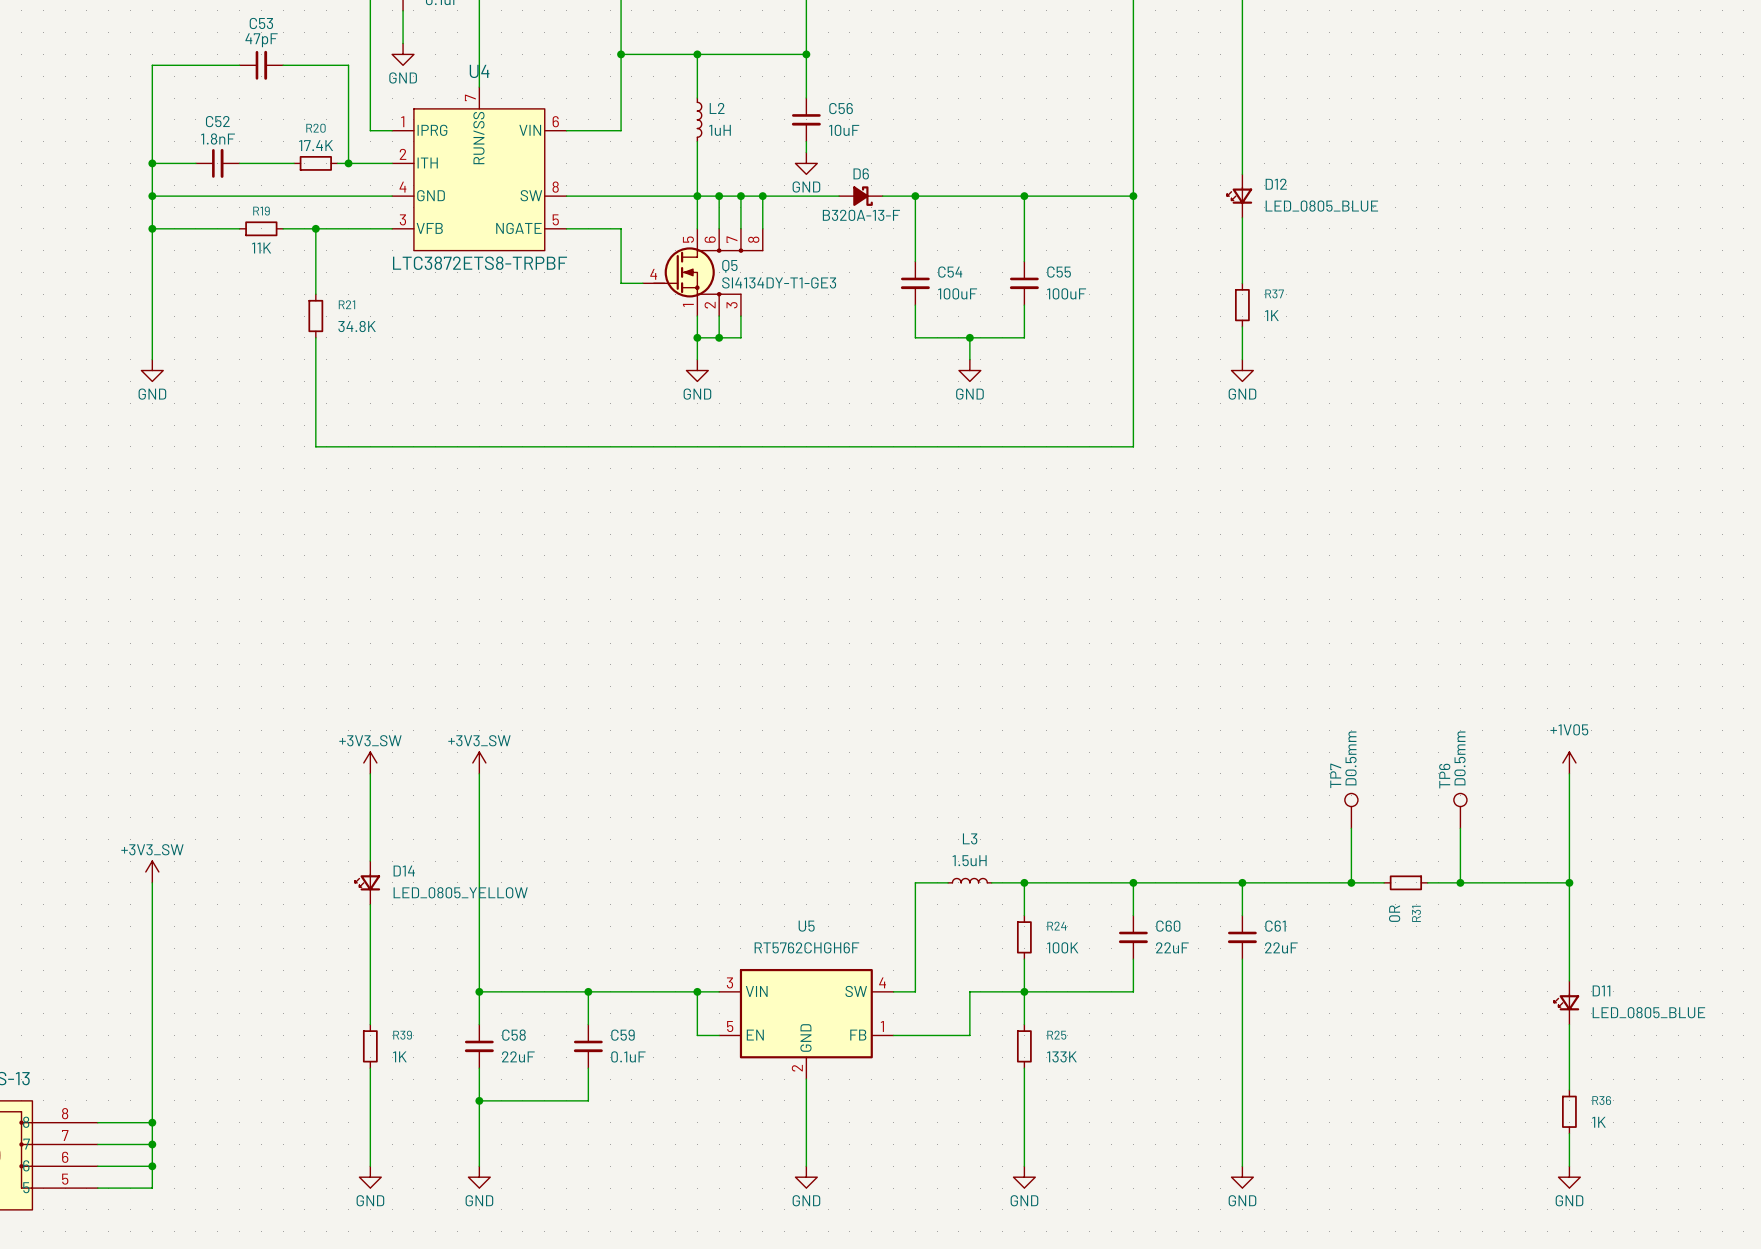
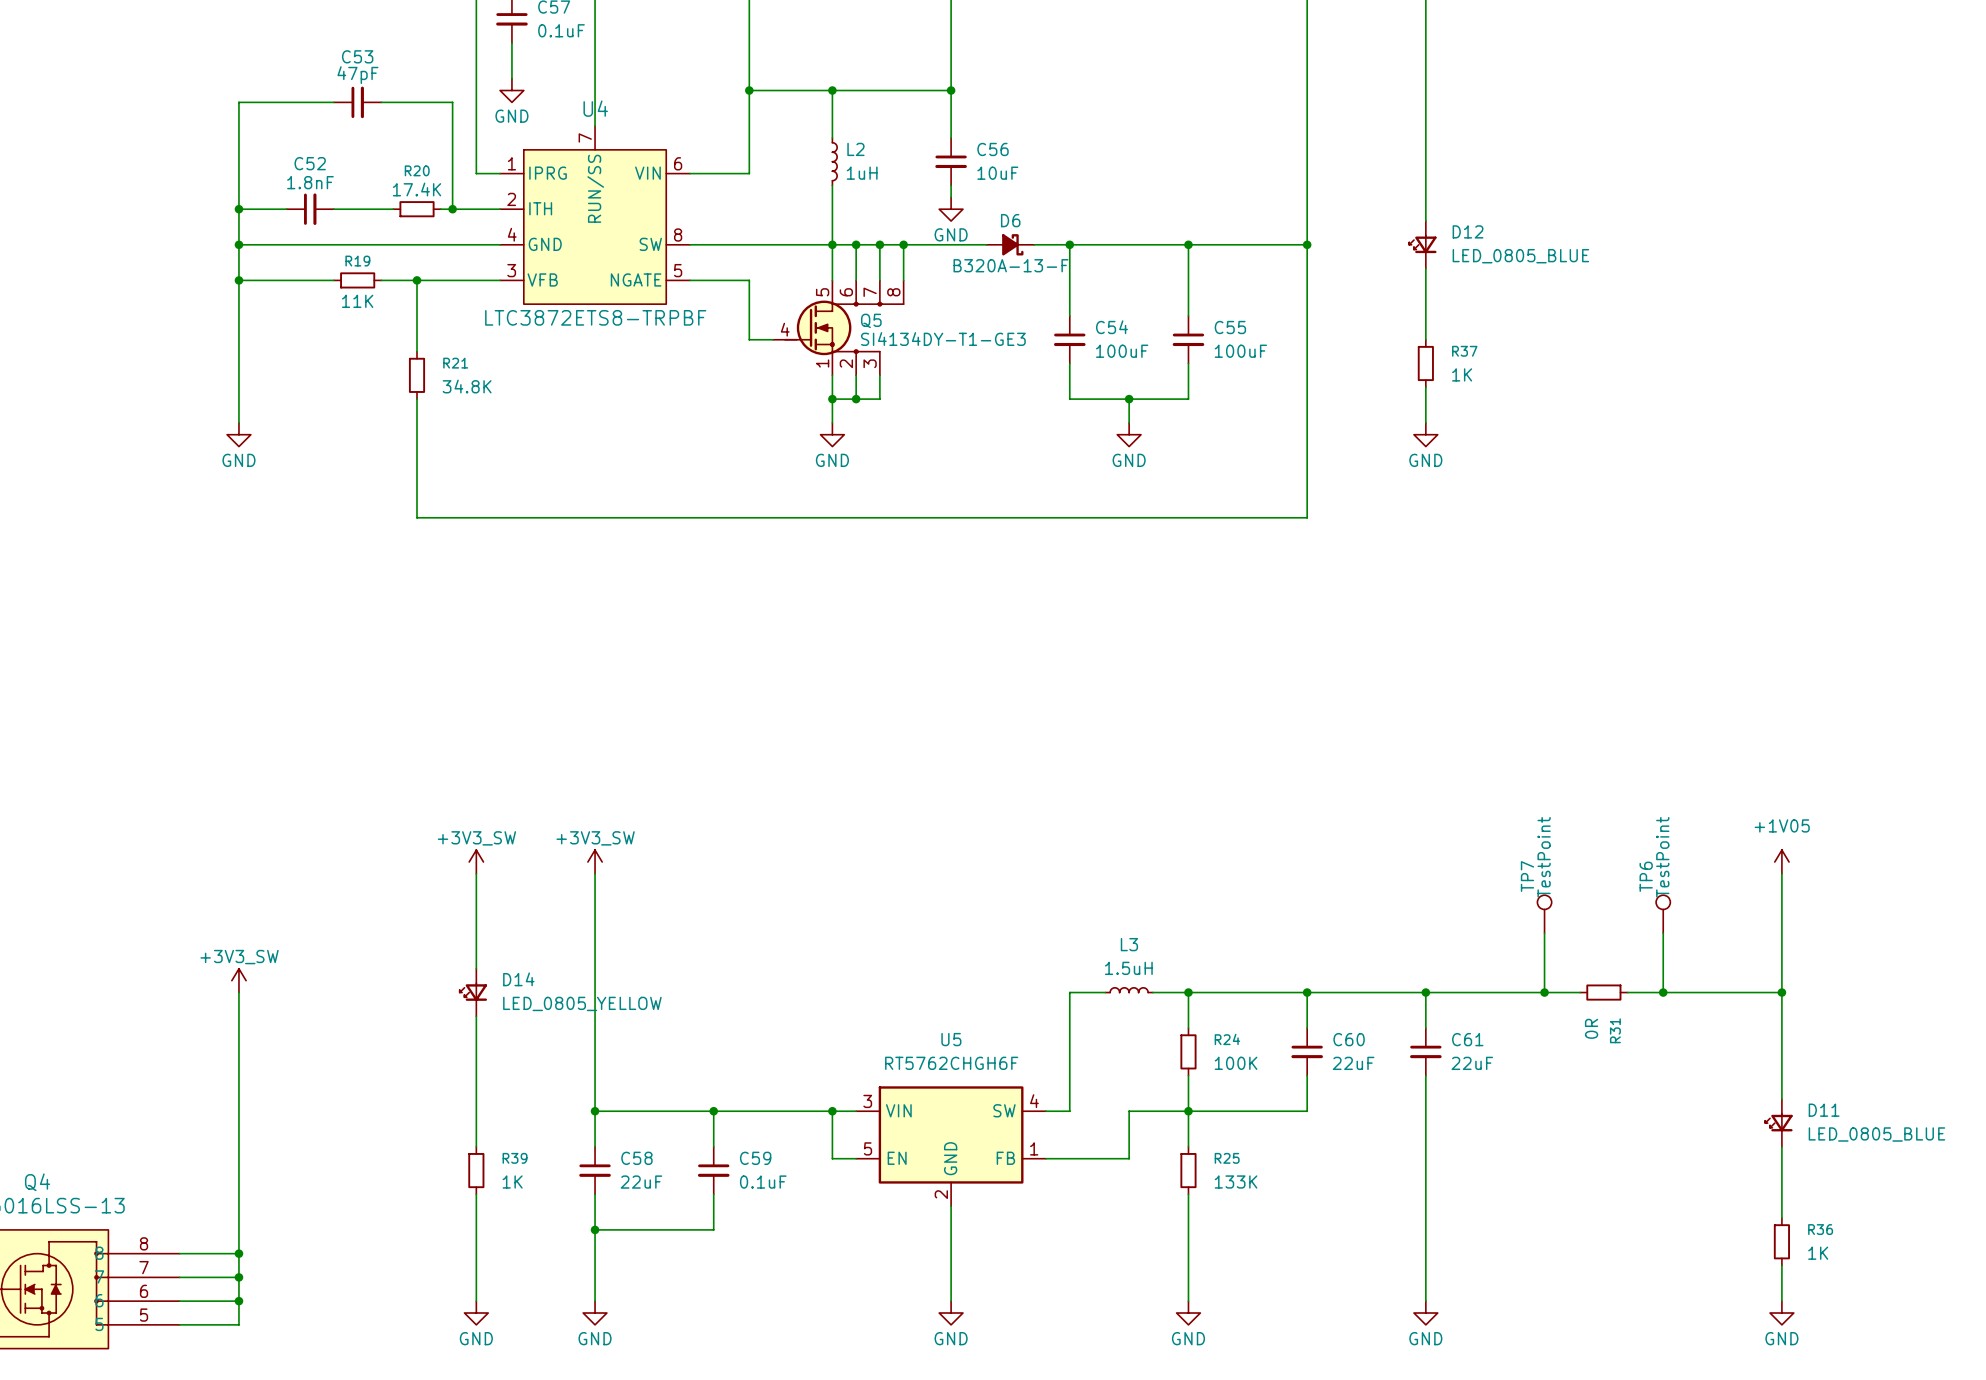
TP7 value: D0.5mm (1351, 758) -> TestPoint (1544, 857)
TP6 value: D0.5mm (1460, 758) -> TestPoint (1662, 857)

